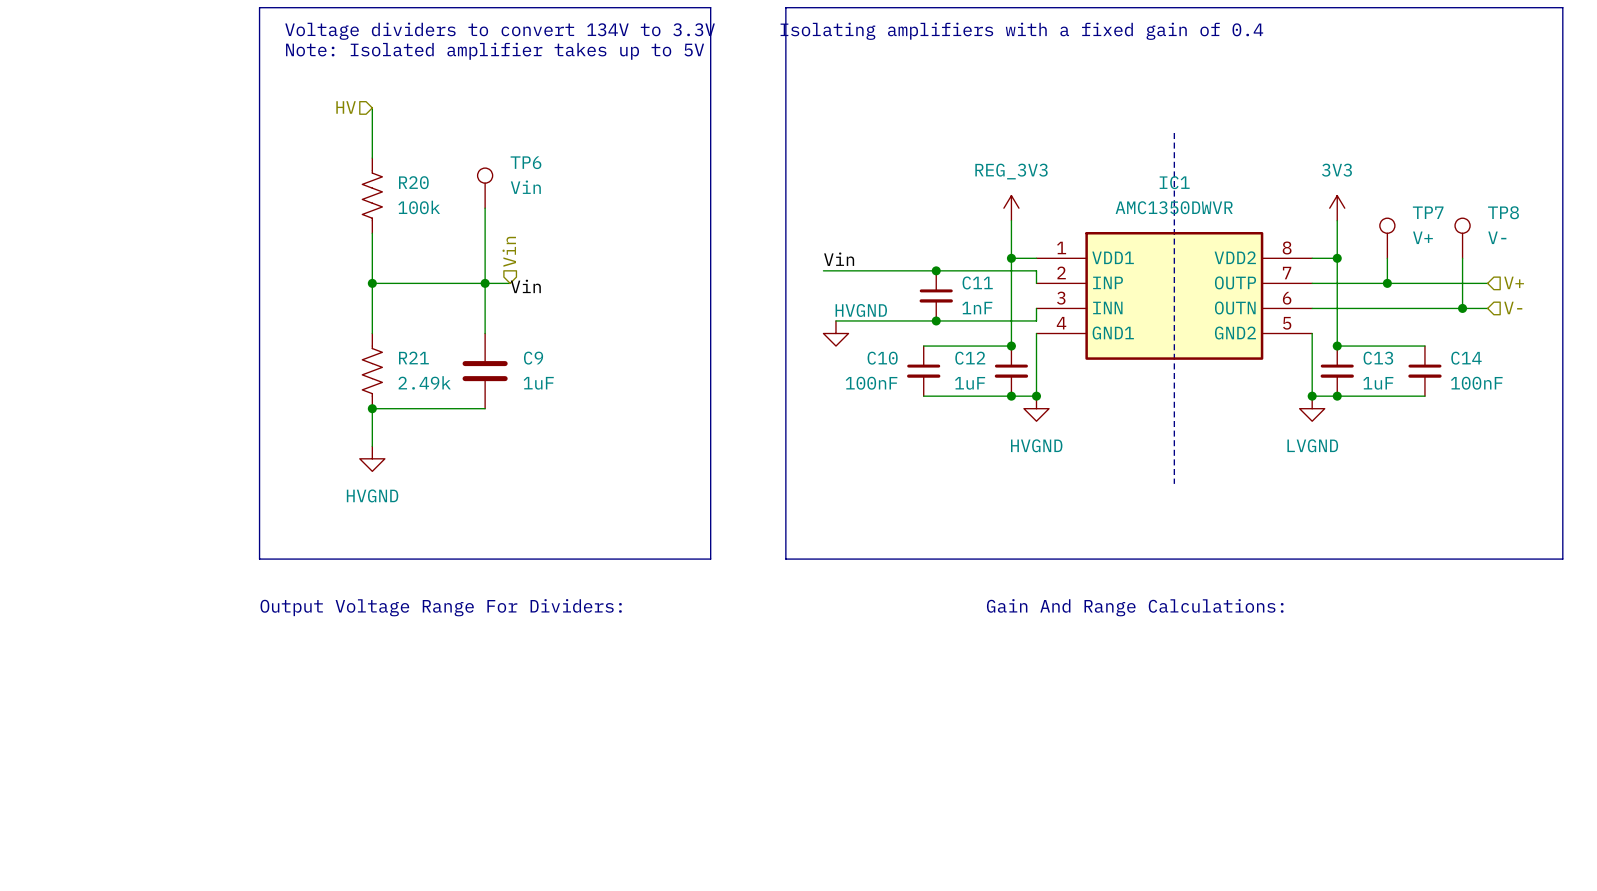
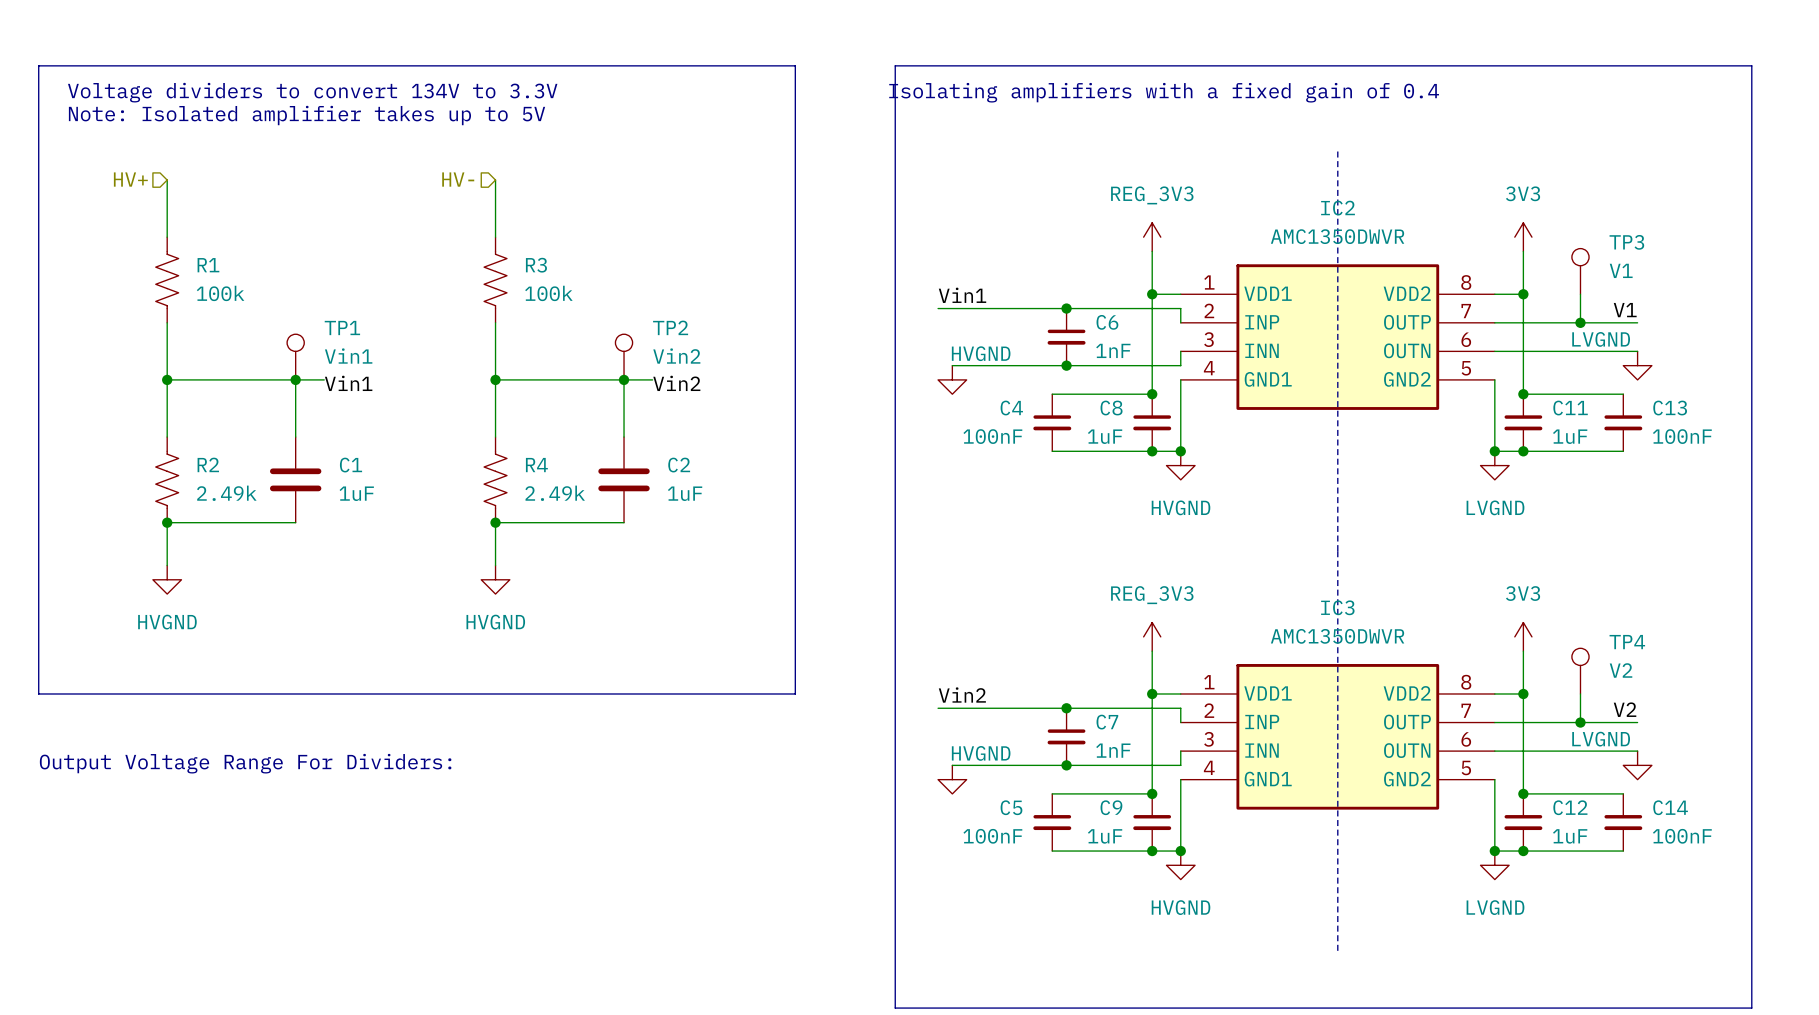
line: (259, 7) (710, 7) (710, 559) (259, 559) (259, 7) -> (38, 65) (38, 693) (795, 693) (795, 65) (38, 65)
text position: Voltage dividers to convert 134V to 3.3V (500, 31) -> Voltage dividers to convert 134V to 3.3V (312, 92)
text position: Isolating amplifiers with a fixed gain of 0.4 (1021, 31) -> Isolating amplifiers with a fixed gain of 0.4 (1164, 92)
text position: Note: Isolated amplifier takes up to 5V (495, 51) -> Note: Isolated amplifier takes up to 5V (307, 115)
line: (785, 57) (785, 7) (1562, 7) (1562, 559) (785, 559) -> (895, 65) (1751, 65) (1751, 1008) (895, 1008) (895, 636)
hierarchical label: HV (346, 107) -> none
wire: (372, 107) (372, 158) -> (495, 180) (495, 237)
hierarchical label: none -> HV+ (130, 179)
hierarchical label: none -> HV- (458, 179)
wire: none -> (167, 180) (167, 237)
IC1 name: IC1 (1174, 182) -> IC2 (1338, 208)
TP6: Vin (485, 188) -> none
R20: 100k (372, 195) -> none
wire: (485, 208) (485, 333) -> none
TP7 name: TP7 (1428, 212) -> TP3 (1626, 242)
wire: (372, 233) (372, 333) -> (495, 322) (495, 437)
TP7 value: V+ (1422, 237) -> V1 (1621, 270)
TP8: V- (1462, 238) -> none
R1: none -> 100k (167, 280)
R3: none -> 100k (495, 280)
hierarchical label: Vin (509, 251) -> none
wire: (1462, 258) (1462, 308) -> none
label: Vin (839, 259) -> Vin1 (962, 295)
label: none -> V1 (1625, 310)
C11 name: C11 (977, 282) -> C6 (1107, 322)
hierarchical label: V+ (1514, 282) -> none
wire: none -> (167, 322) (167, 437)
wire: (372, 283) (510, 283) -> (495, 379) (652, 379)
junction: (372, 283) -> none
junction: (485, 283) -> none
wire: (1437, 283) (1487, 283) -> none
label: Vin (525, 286) -> none
hierarchical label: V- (1513, 307) -> none
wire: (1437, 308) (1487, 308) -> none
junction: (1462, 308) -> none
TP1: none -> Vin1 (295, 357)
TP2: none -> Vin2 (624, 357)
power symbol: none -> LVGND (1637, 365)
wire: none -> (167, 379) (324, 379)
junction: none -> (167, 379)
junction: none -> (295, 379)
junction: none -> (495, 379)
C9 symbol: [462, 333, 508, 409] -> [1133, 793, 1172, 852]
wire: none -> (624, 379) (624, 437)
junction: none -> (624, 379)
label: none -> Vin1 (348, 383)
label: none -> Vin2 (676, 383)
C9 name position: C9 (533, 358) -> C9 (1111, 807)
C10 name: C10 (882, 358) -> C4 (1011, 408)
C12 name: C12 (970, 358) -> C8 (1111, 408)
C13 name: C13 (1378, 358) -> C11 (1570, 408)
C14 name: C14 (1466, 358) -> C13 (1670, 408)
R21: 2.49k (372, 371) -> none
C9 value position: 1uF (538, 383) -> 1uF (1105, 836)
junction: (372, 408) -> none
wire: (485, 408) (372, 408) (372, 446) -> (624, 522) (495, 522) (495, 565)
R2: none -> 2.49k (167, 479)
C1: none -> 1uF (295, 479)
R4: none -> 2.49k (495, 479)
C2: none -> 1uF (624, 479)
junction: none -> (167, 522)
wire: none -> (295, 522) (167, 522) (167, 565)
power symbol position: HVGND (372, 458) -> HVGND (495, 579)
junction: none -> (495, 522)
line: none -> (1337, 551) (1337, 950)
power symbol: none -> HVGND (167, 579)
power symbol: none -> REG_3V3 (1152, 636)
power symbol: none -> 3V3 (1523, 636)
wire: none -> (1152, 651) (1152, 793) (1052, 793)
wire: none -> (1523, 651) (1523, 793) (1623, 793)
TP4: none -> V2 (1580, 671)
text position: Output Voltage Range For Dividers: (441, 607) -> Output Voltage Range For Dividers: (245, 763)
text: Gain And Range Calculations: (1135, 607) -> none
wire: none -> (1152, 693) (1180, 693)
junction: none -> (1152, 693)
wire: none -> (1494, 693) (1523, 693)
junction: none -> (1523, 693)
wire: none -> (1580, 693) (1580, 722)
label: none -> Vin2 (962, 695)
wire: none -> (938, 708) (1180, 708) (1180, 722)
junction: none -> (1066, 708)
label: none -> V2 (1625, 709)
wire: none -> (1494, 722) (1637, 722)
junction: none -> (1580, 722)
C7: none -> 1nF (1066, 736)
IC3: none -> AMC1350DWVR (1337, 736)
wire: none -> (1180, 751) (1180, 765) (952, 765)
wire: none -> (1494, 751) (1637, 751)
junction: none -> (1066, 765)
power symbol: none -> LVGND (1637, 765)
power symbol: none -> HVGND (952, 779)
wire: none -> (1180, 779) (1180, 851) (1052, 851)
wire: none -> (1494, 779) (1494, 851) (1623, 851)
junction: none -> (1152, 793)
junction: none -> (1523, 793)
C5: none -> 100nF (1052, 822)
C12: none -> 1uF (1523, 822)
C14: none -> 100nF (1623, 822)
junction: none -> (1152, 851)
junction: none -> (1180, 851)
junction: none -> (1494, 851)
junction: none -> (1523, 851)
power symbol: none -> HVGND (1180, 865)
power symbol: none -> LVGND (1494, 865)

